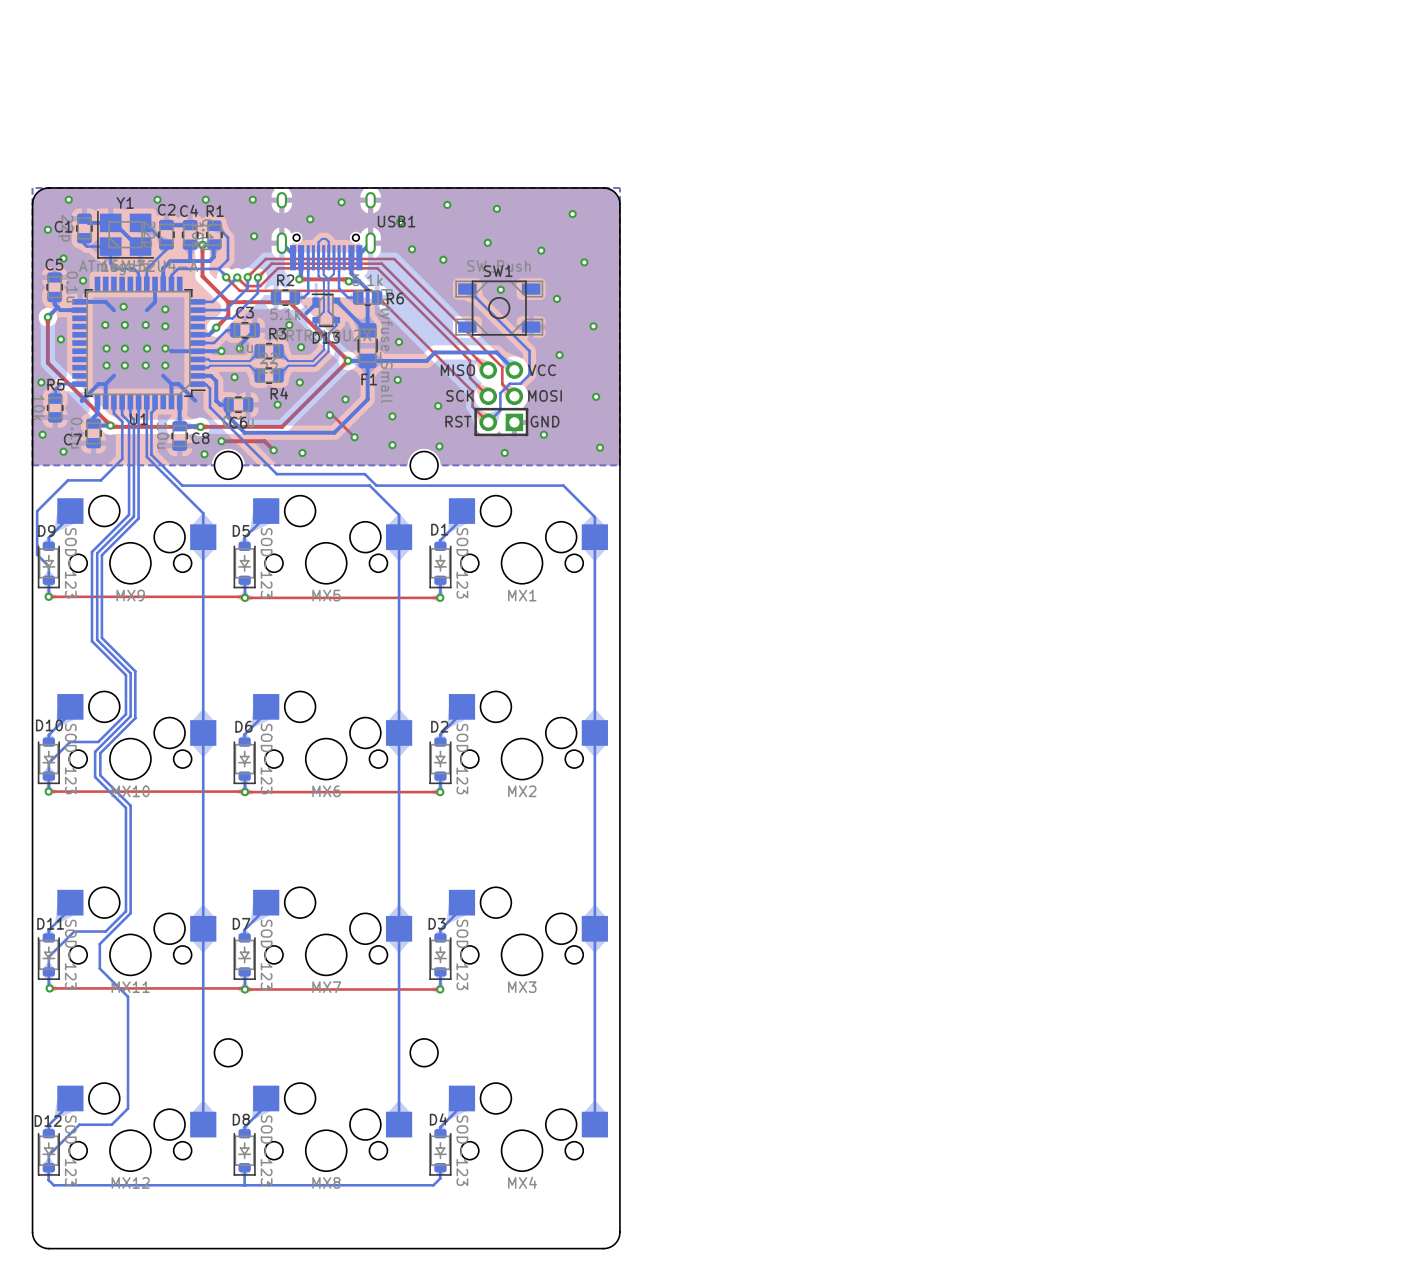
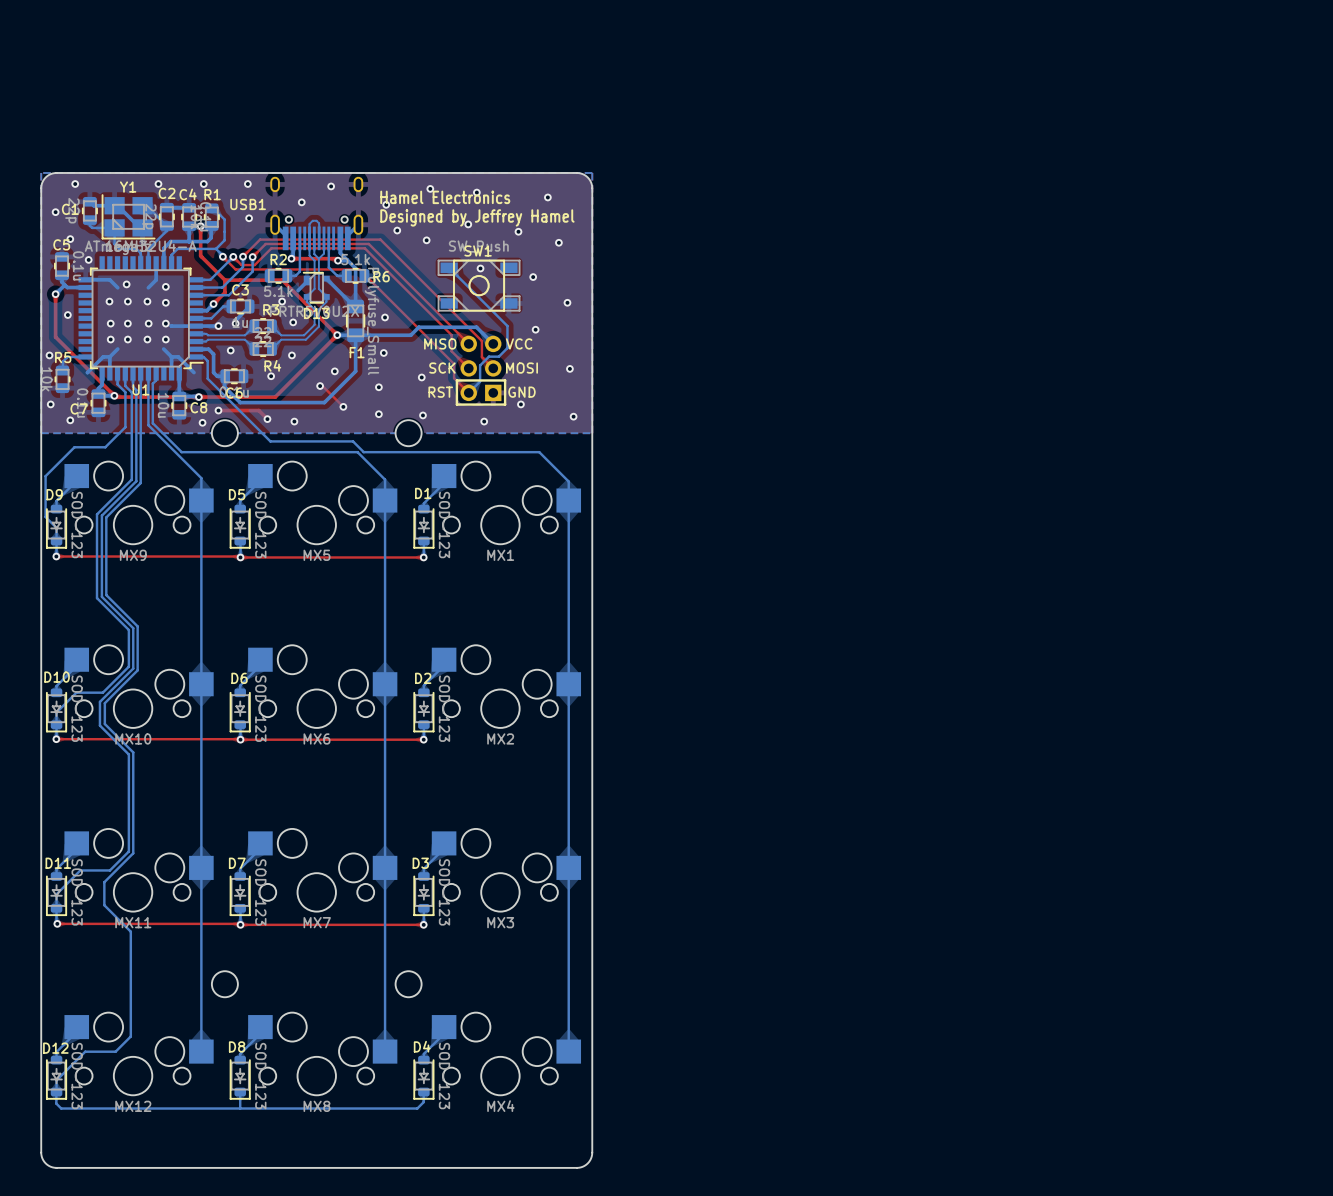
text: none -> Hamel Electronics (445, 197)
USB1 name position: USB1 (396, 221) -> USB1 (248, 204)
text: none -> Designed by Jeffrey Hamel (477, 217)

